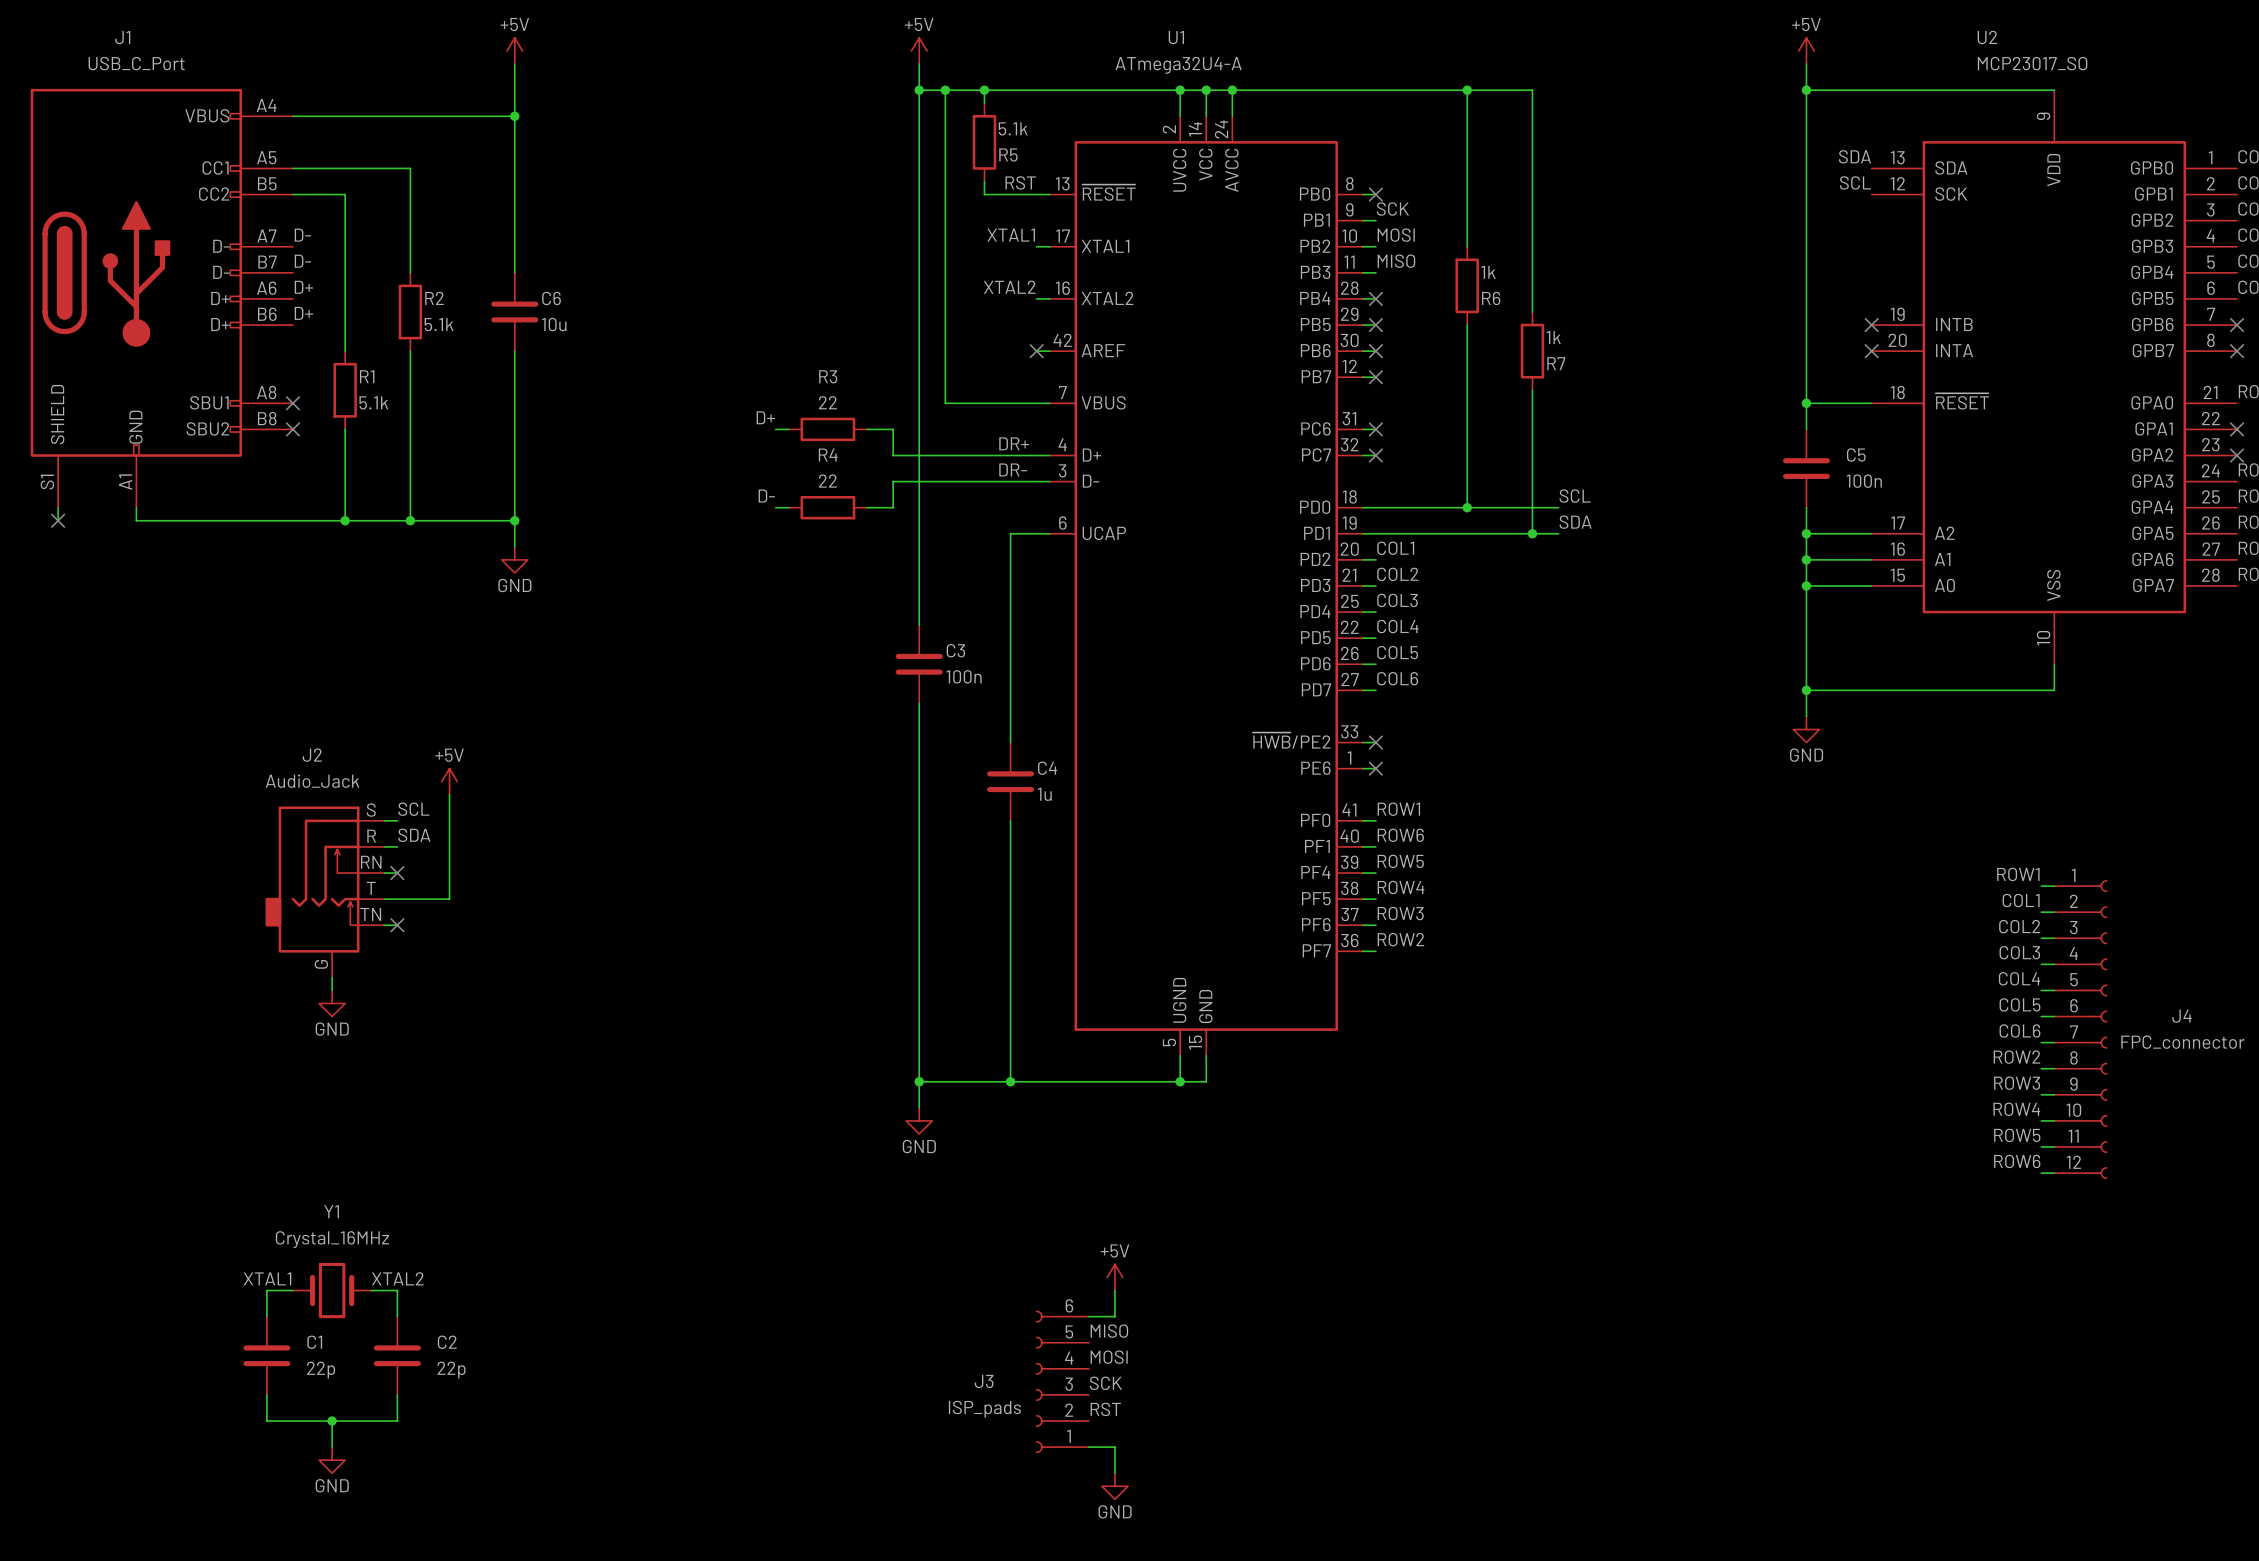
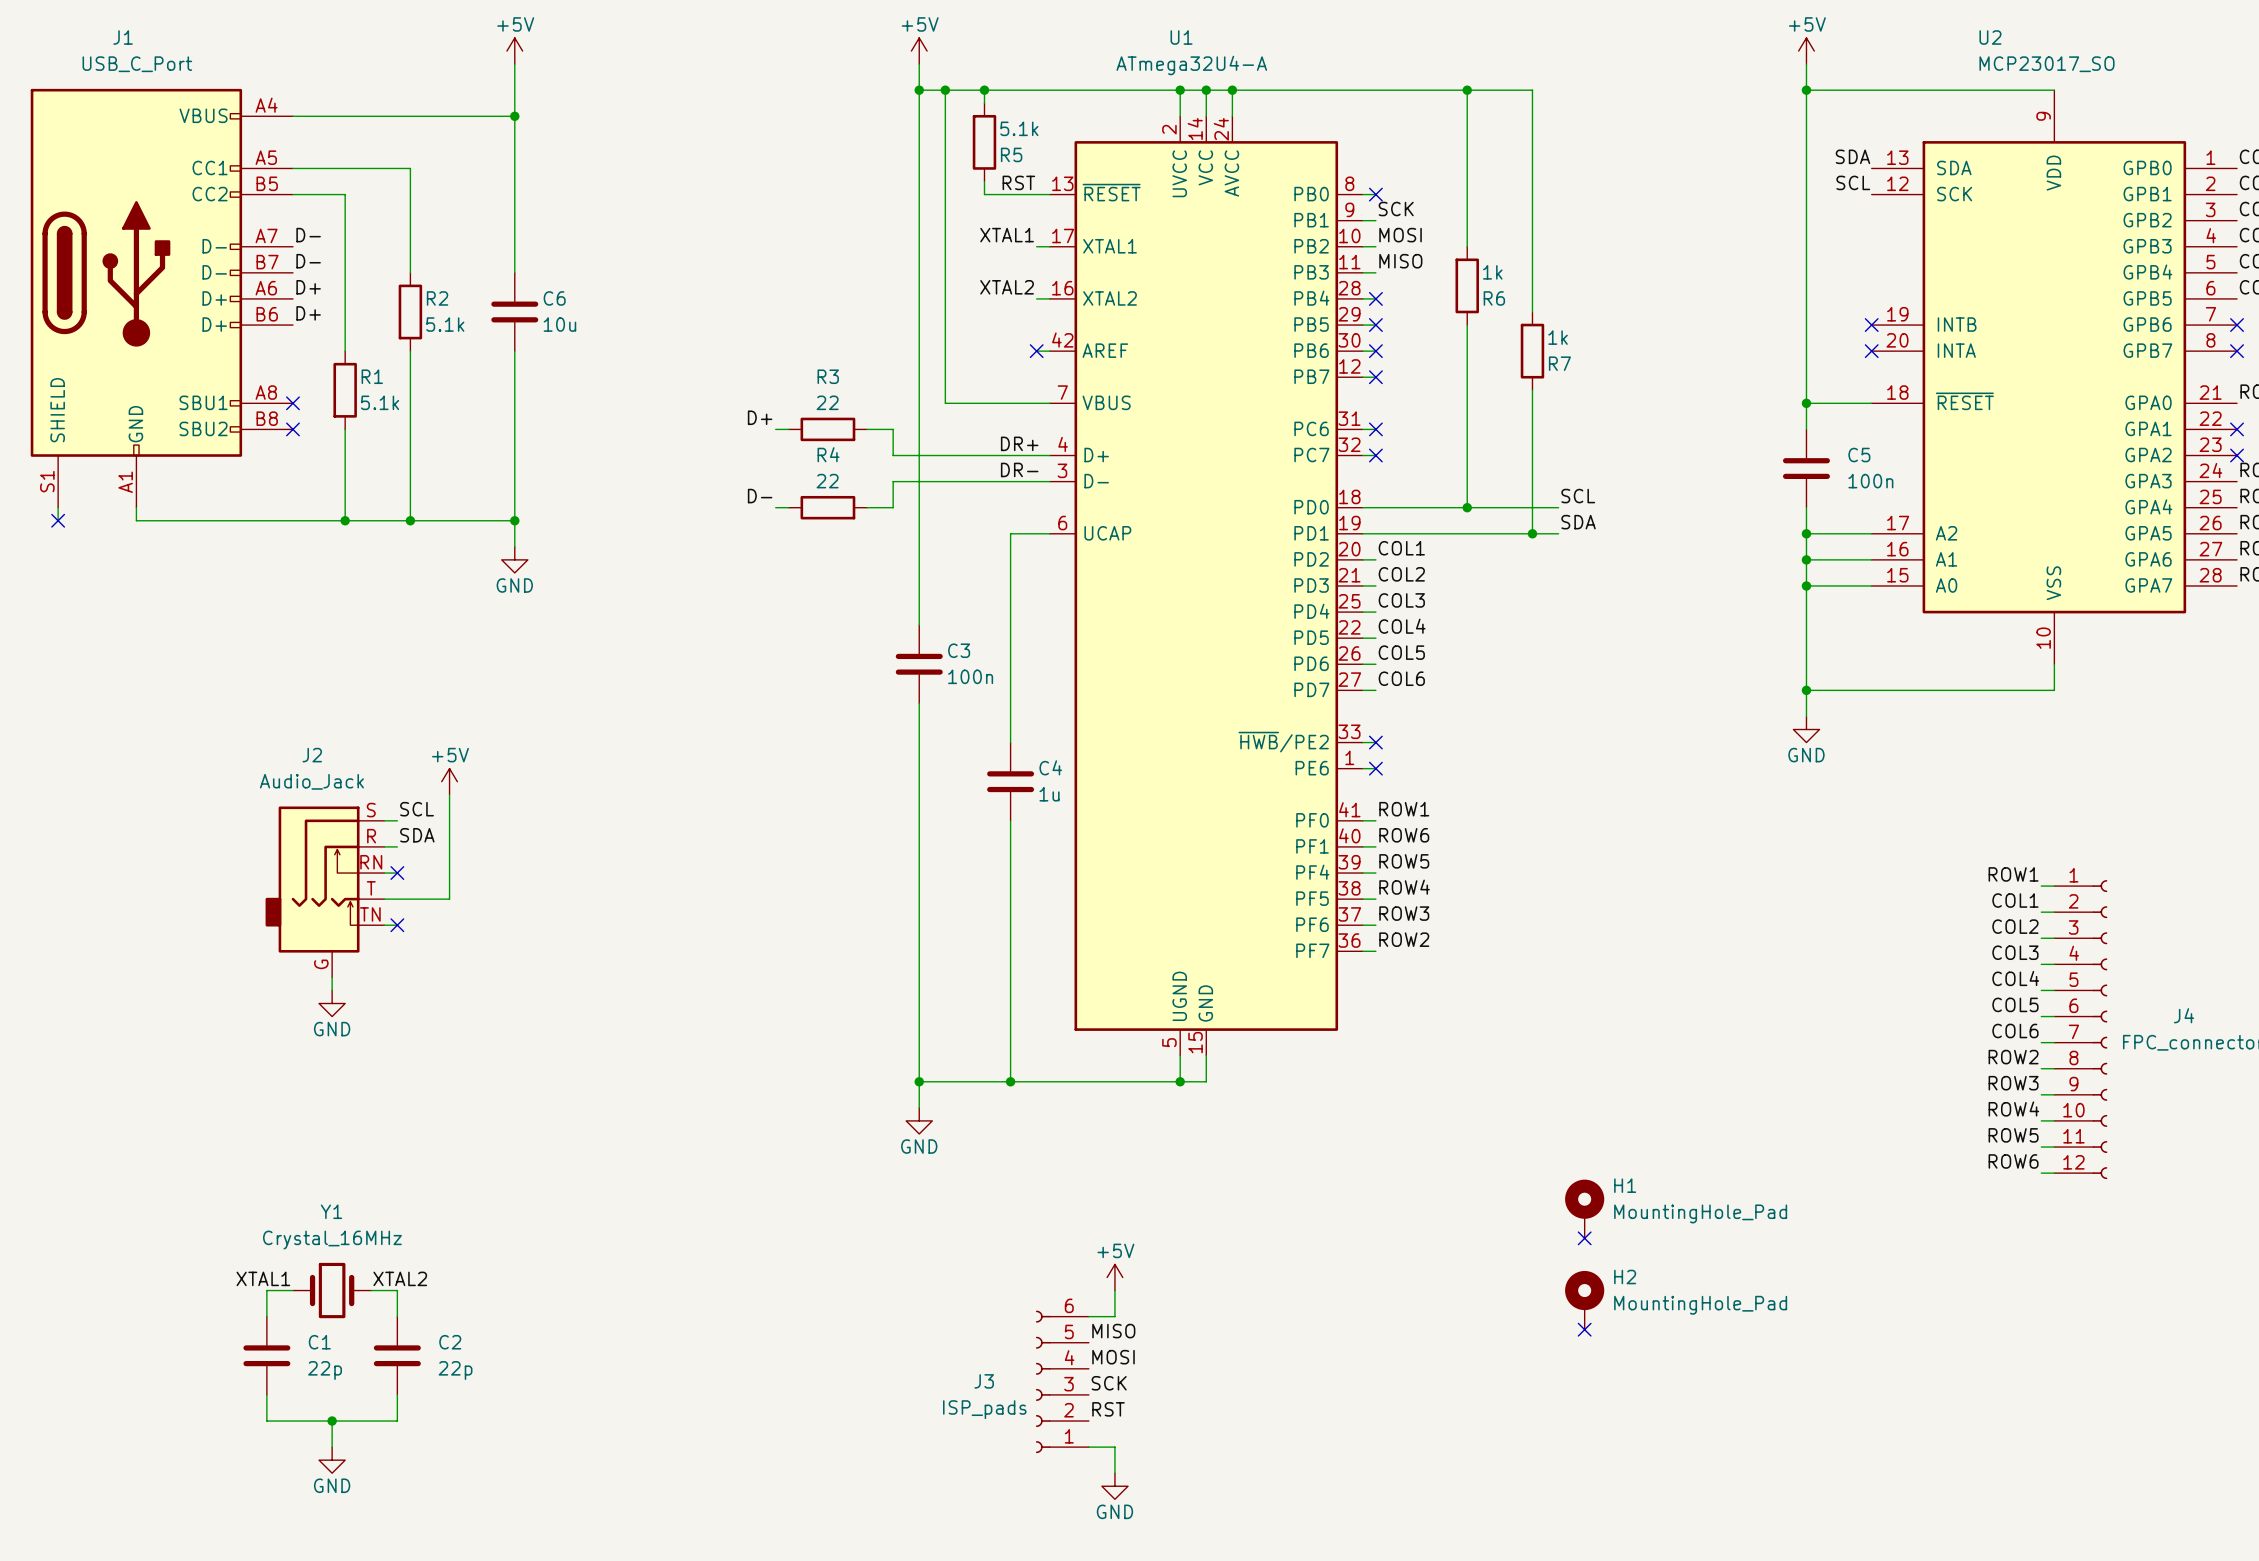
H1: none -> MountingHole_Pad (1584, 1208)
no-connect mark: none -> (1584, 1238)
H2: none -> MountingHole_Pad (1584, 1300)
no-connect mark: none -> (1584, 1329)

